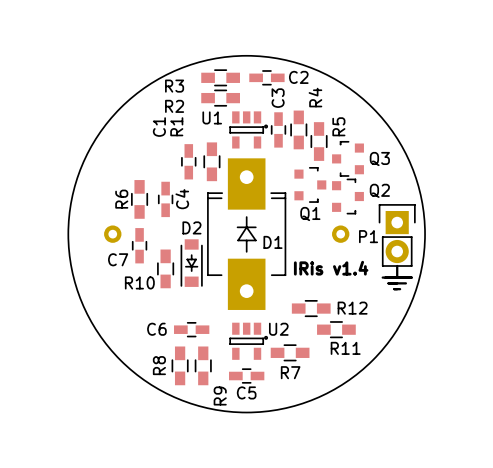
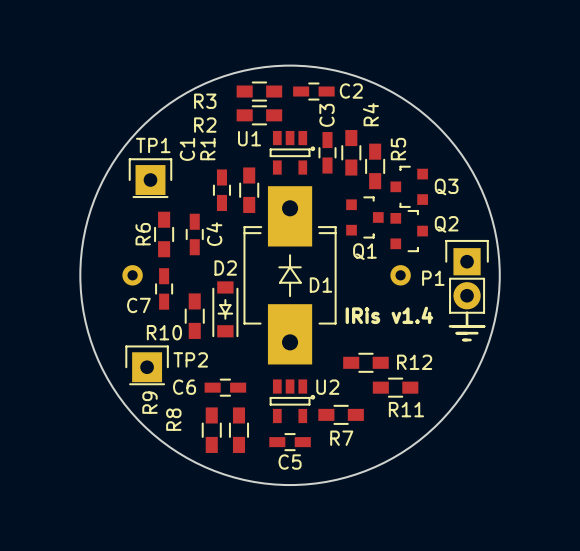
TP1: none -> (150, 178)
TP2: none -> (147, 365)
R8 name: R8 (159, 365) -> R9 (149, 402)
R9 name: R9 (220, 395) -> R8 (173, 419)

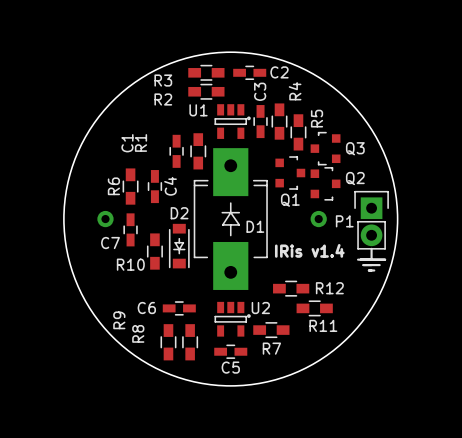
C1 name position: C1 (187, 149) -> C1 (127, 143)
R1 name position: R1 (207, 149) -> R1 (140, 142)
TP1: (150, 178) -> none
TP2: (147, 365) -> none

